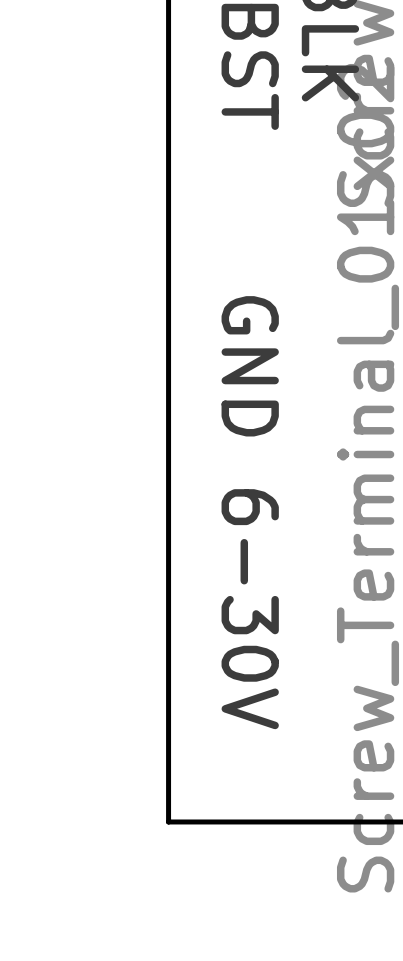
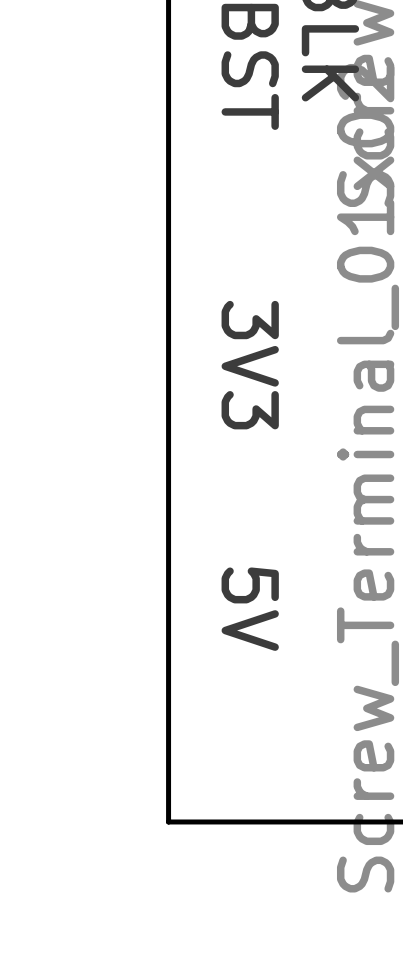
text: GND (250, 366) -> 3V3 (250, 365)
text: 6-30V (250, 609) -> 5V (250, 609)

